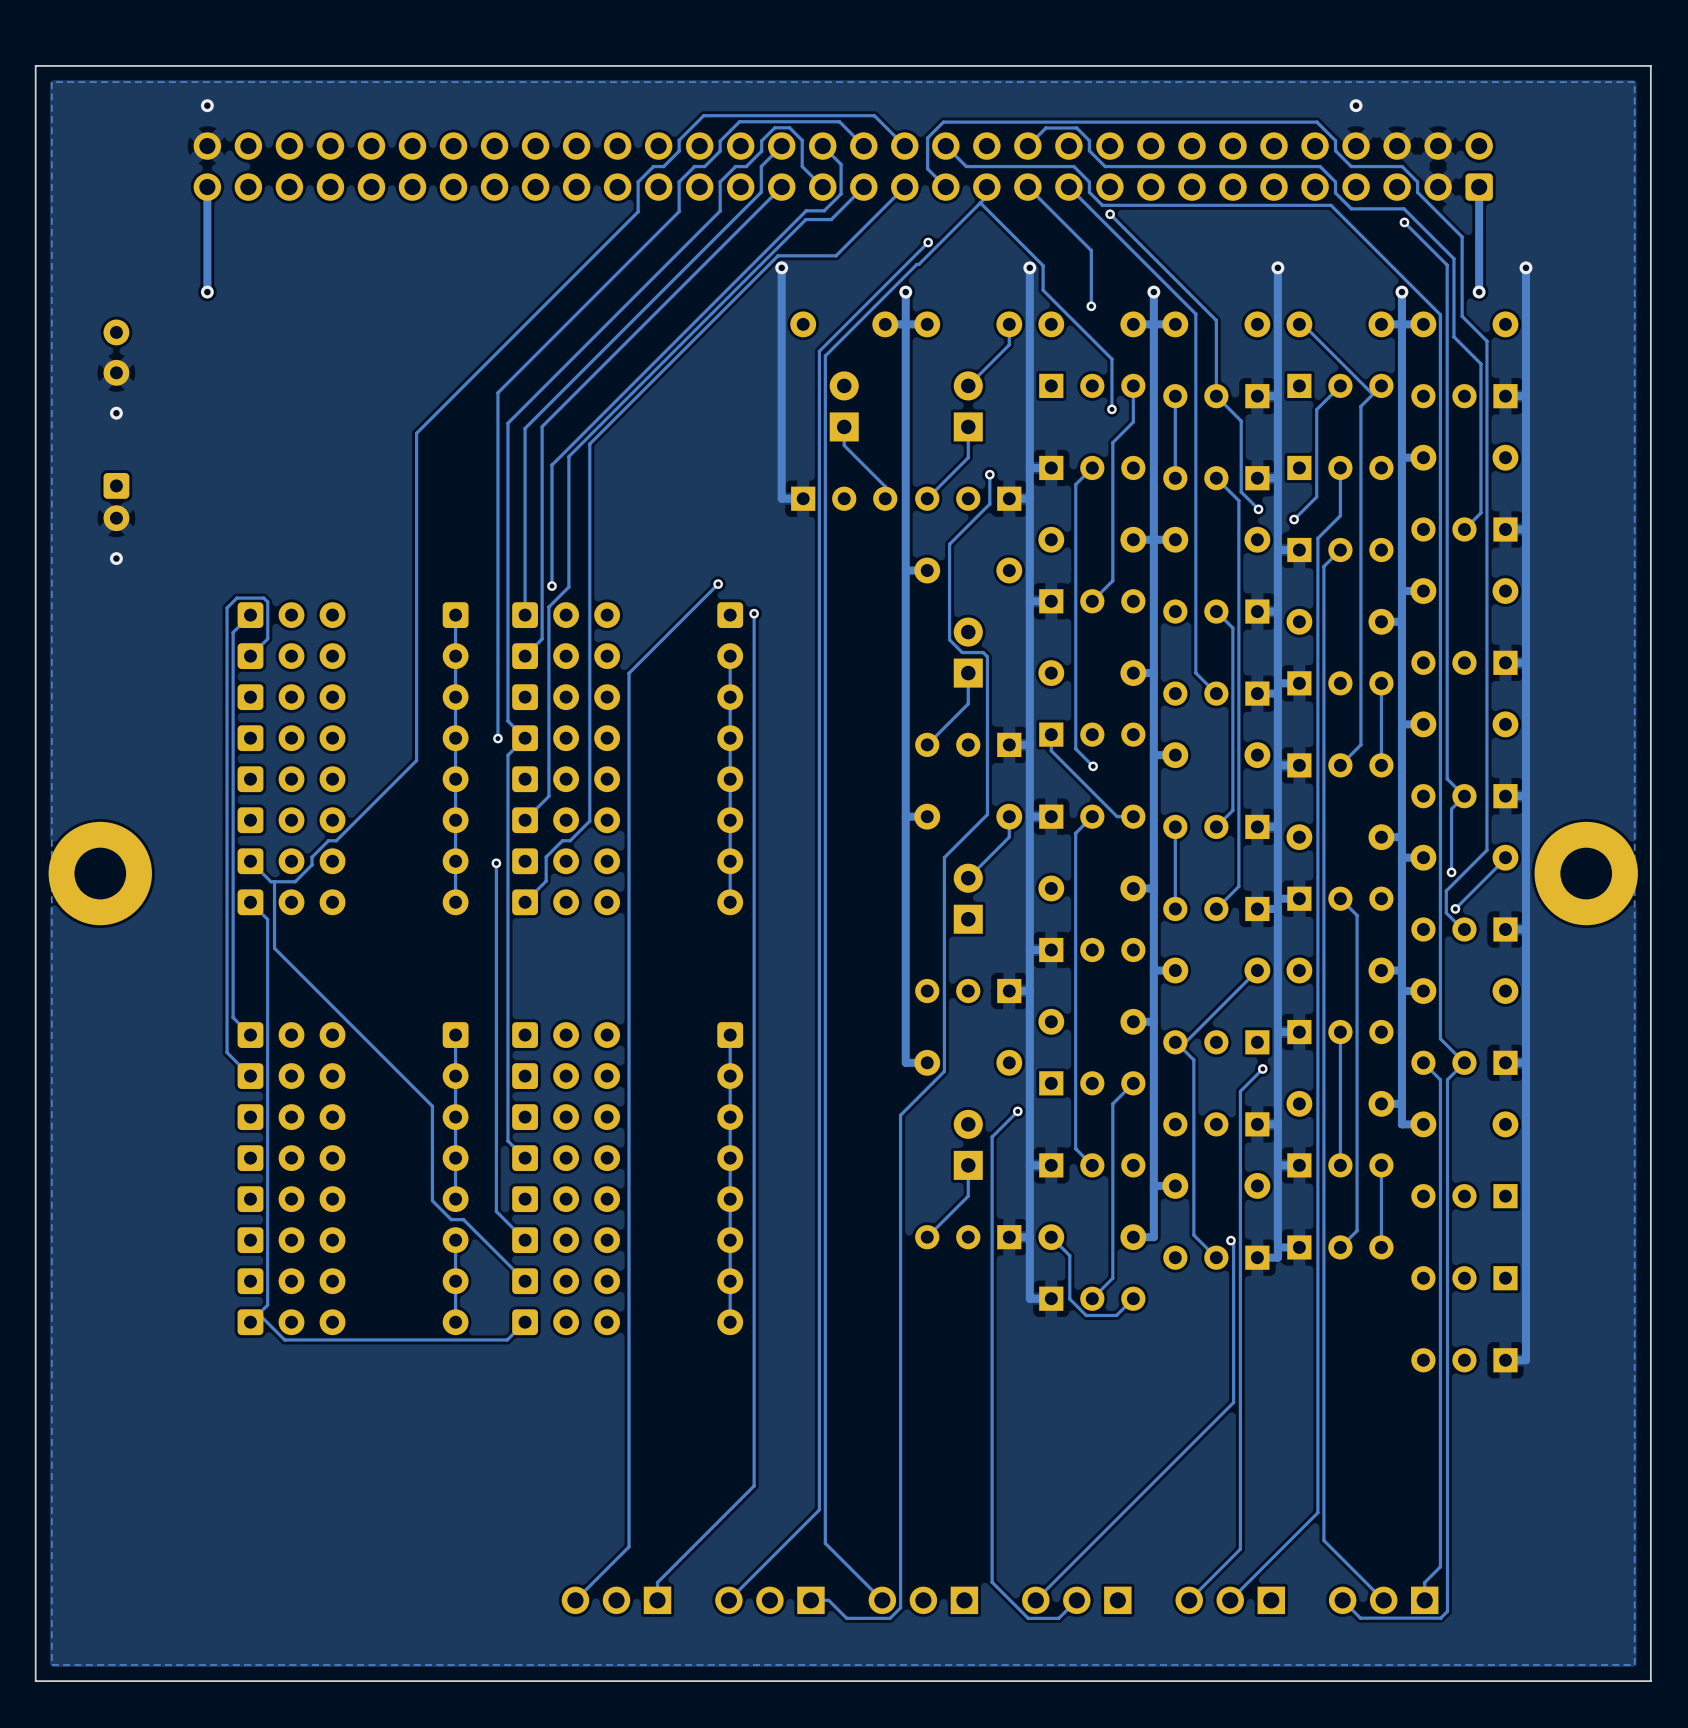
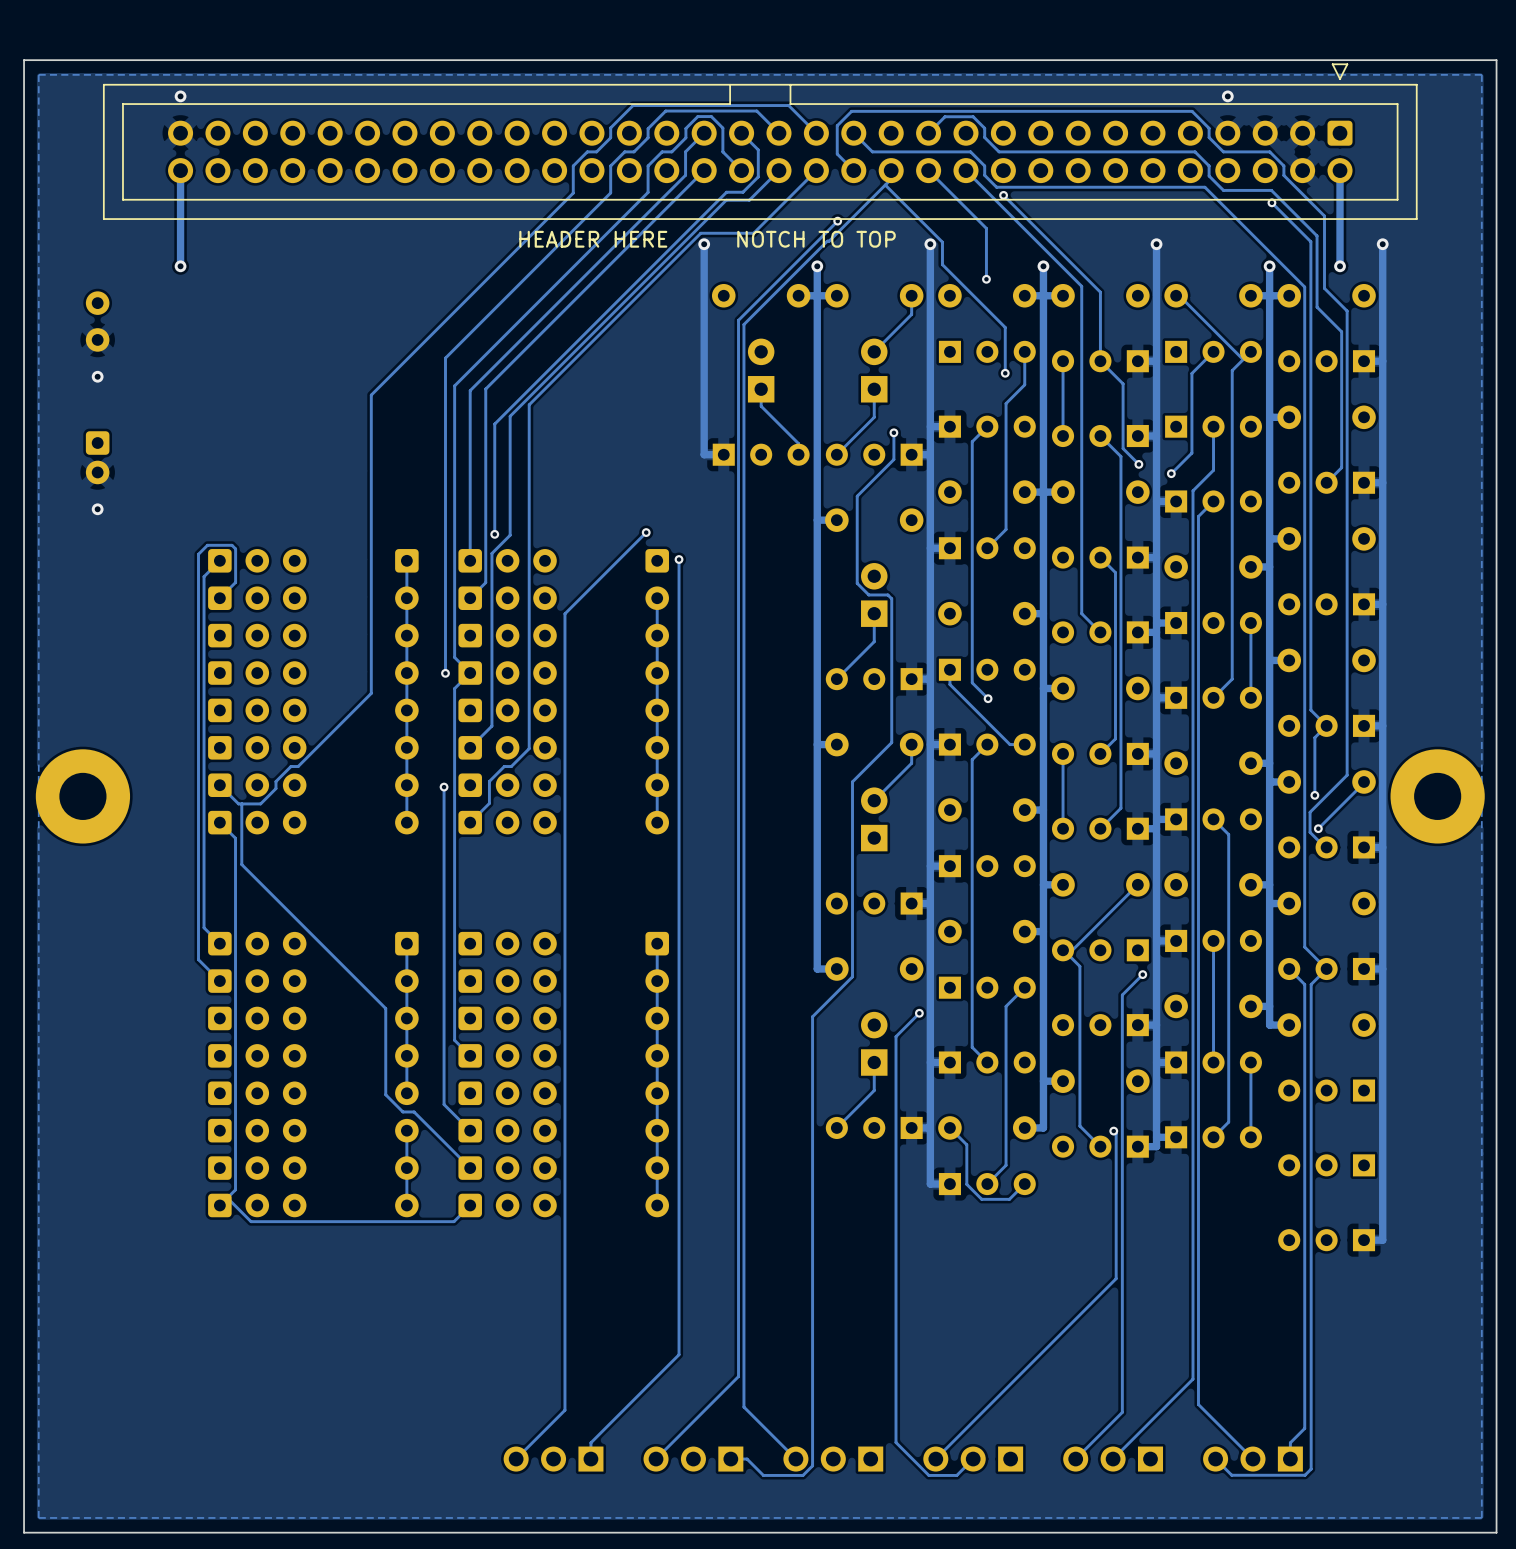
part side: top (843, 166) -> bottom (760, 141)
text: none -> HEADER HERE (593, 239)
text: none -> NOTCH TO TOP (816, 239)

